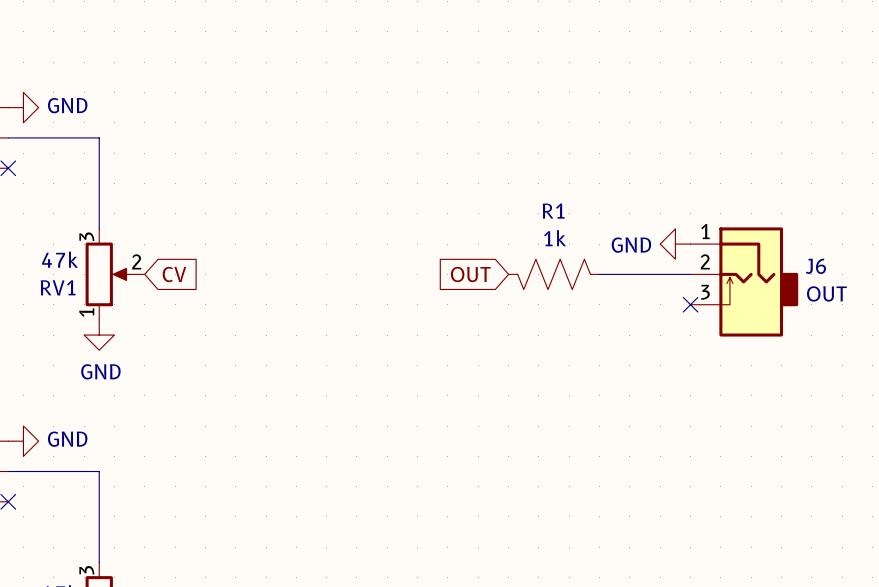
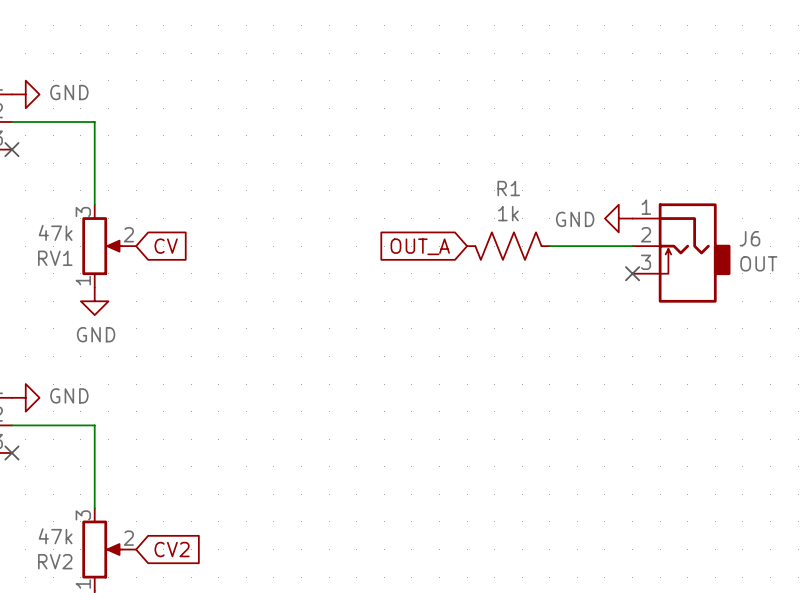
global label: OUT (470, 274) -> OUT_A (420, 246)

